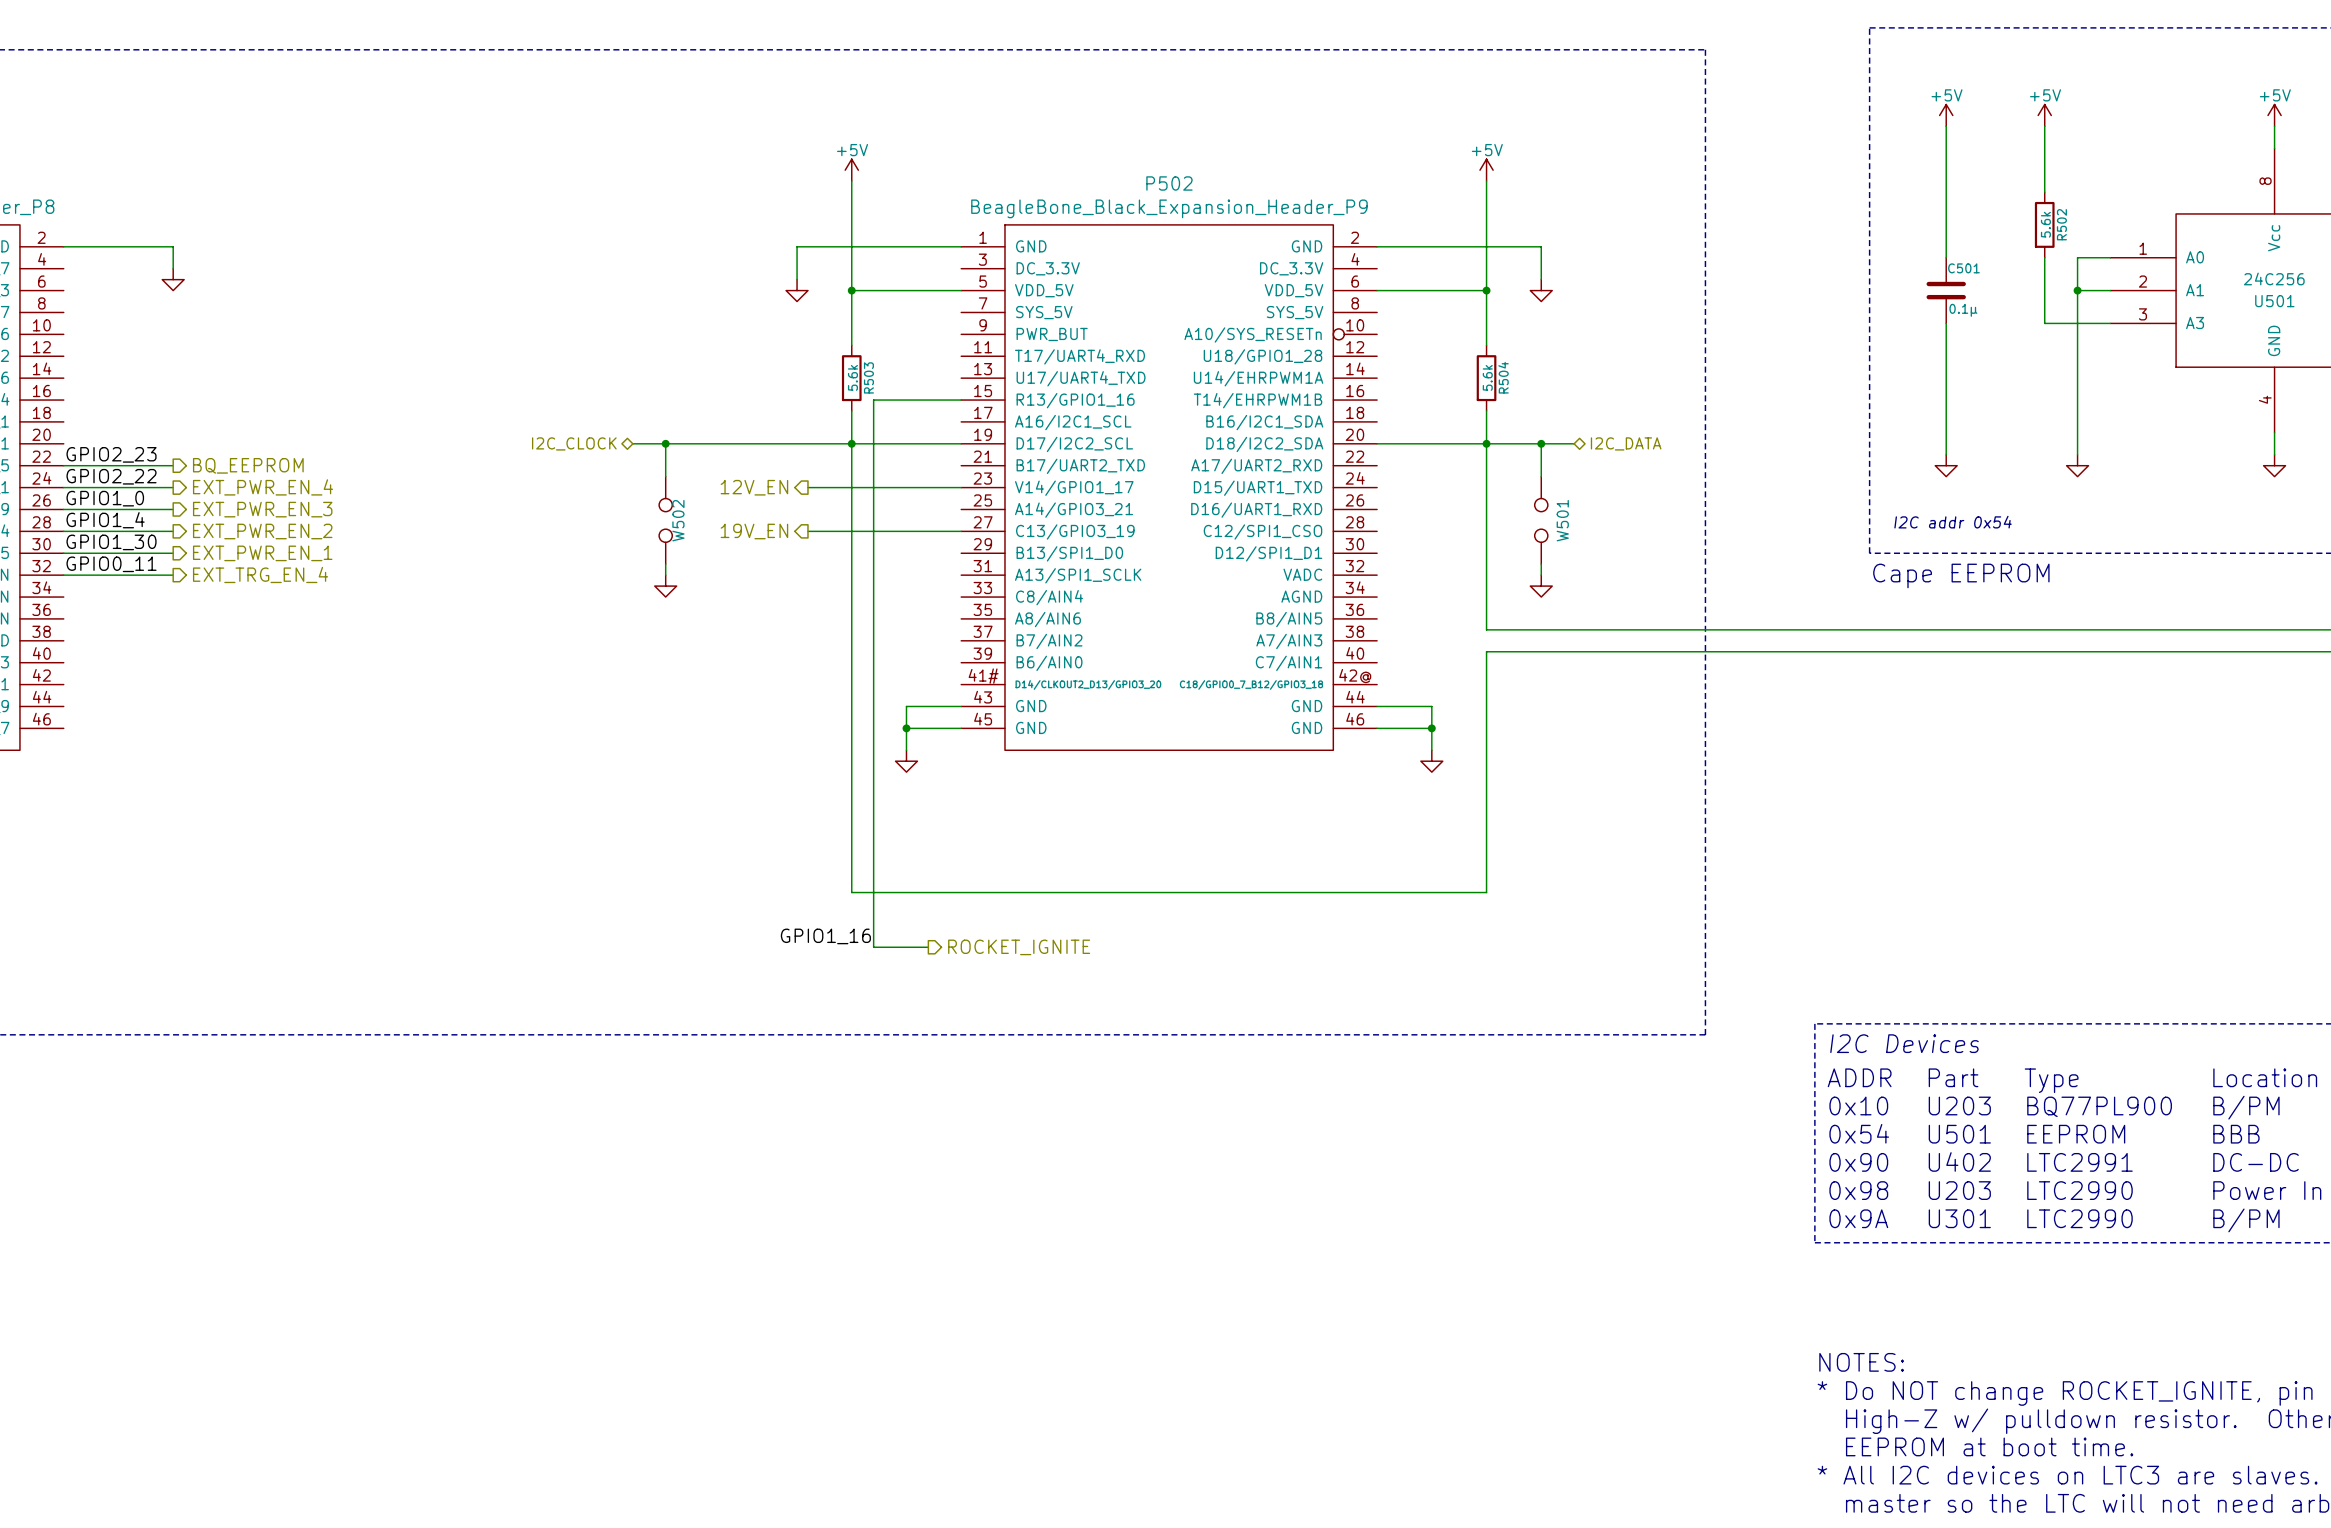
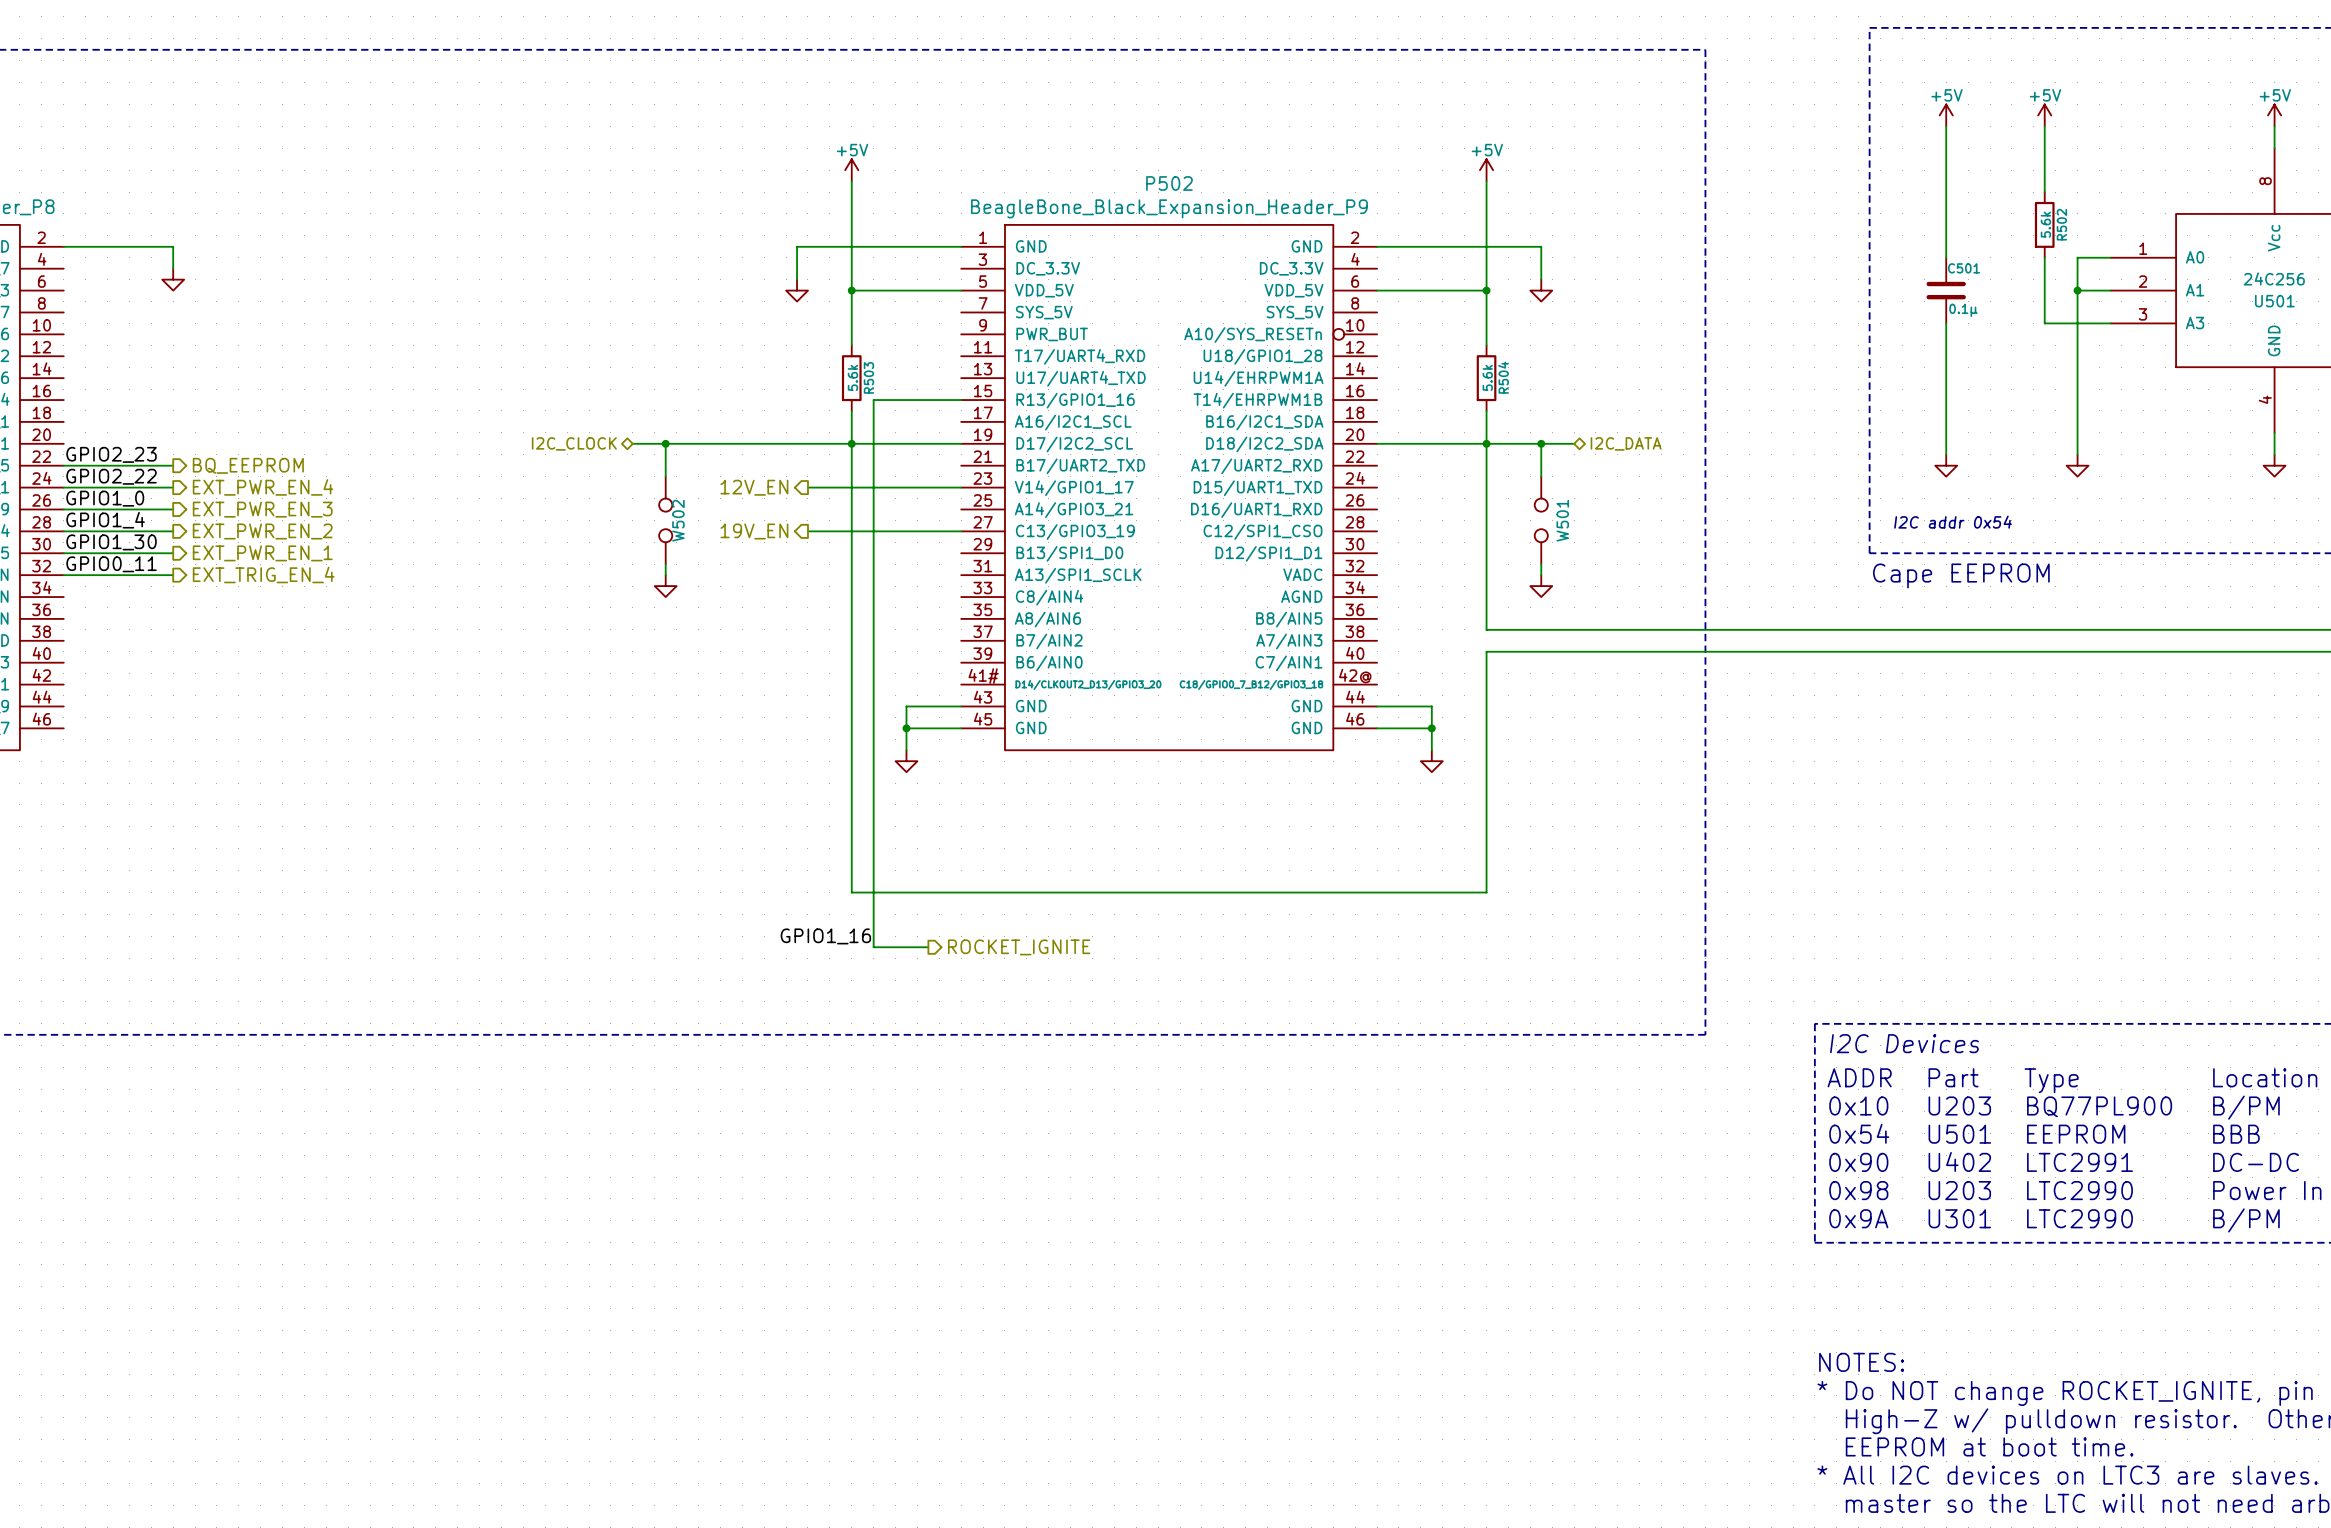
hierarchical label: EXT_TRG_EN_4 (260, 574) -> EXT_TRIG_EN_4 (263, 574)

